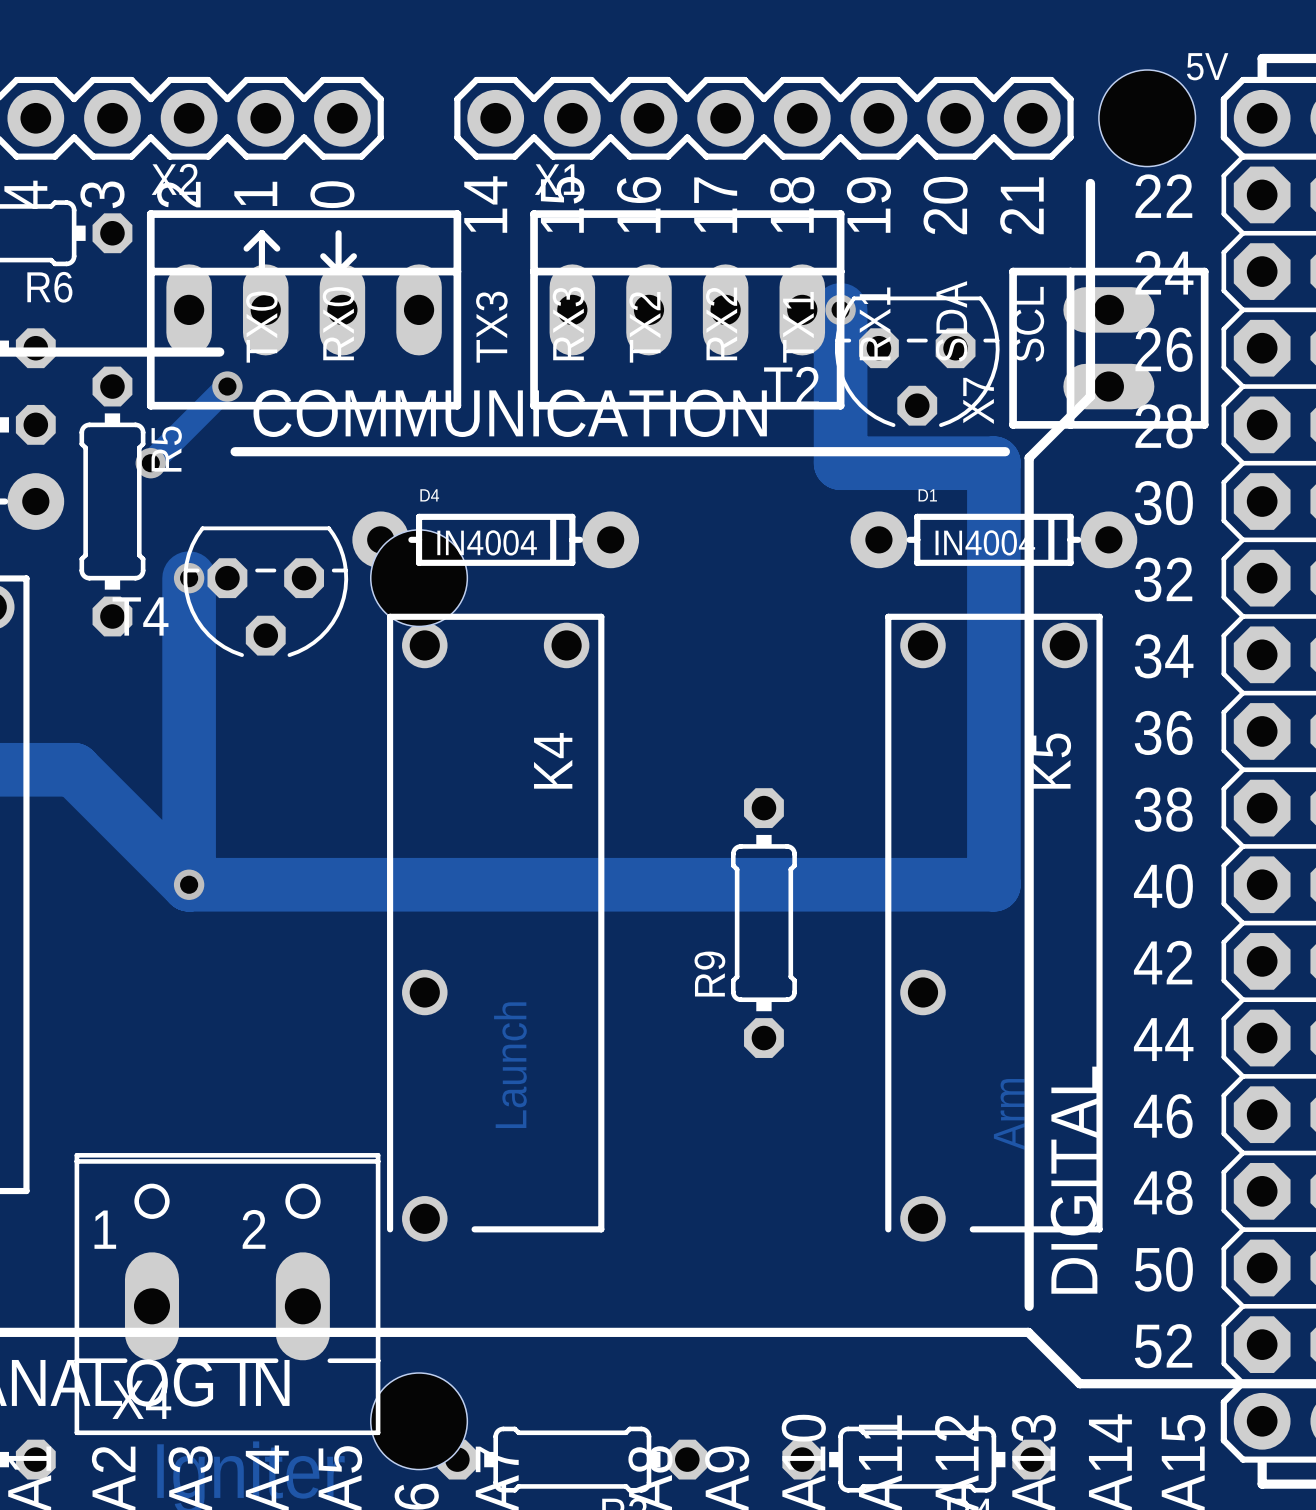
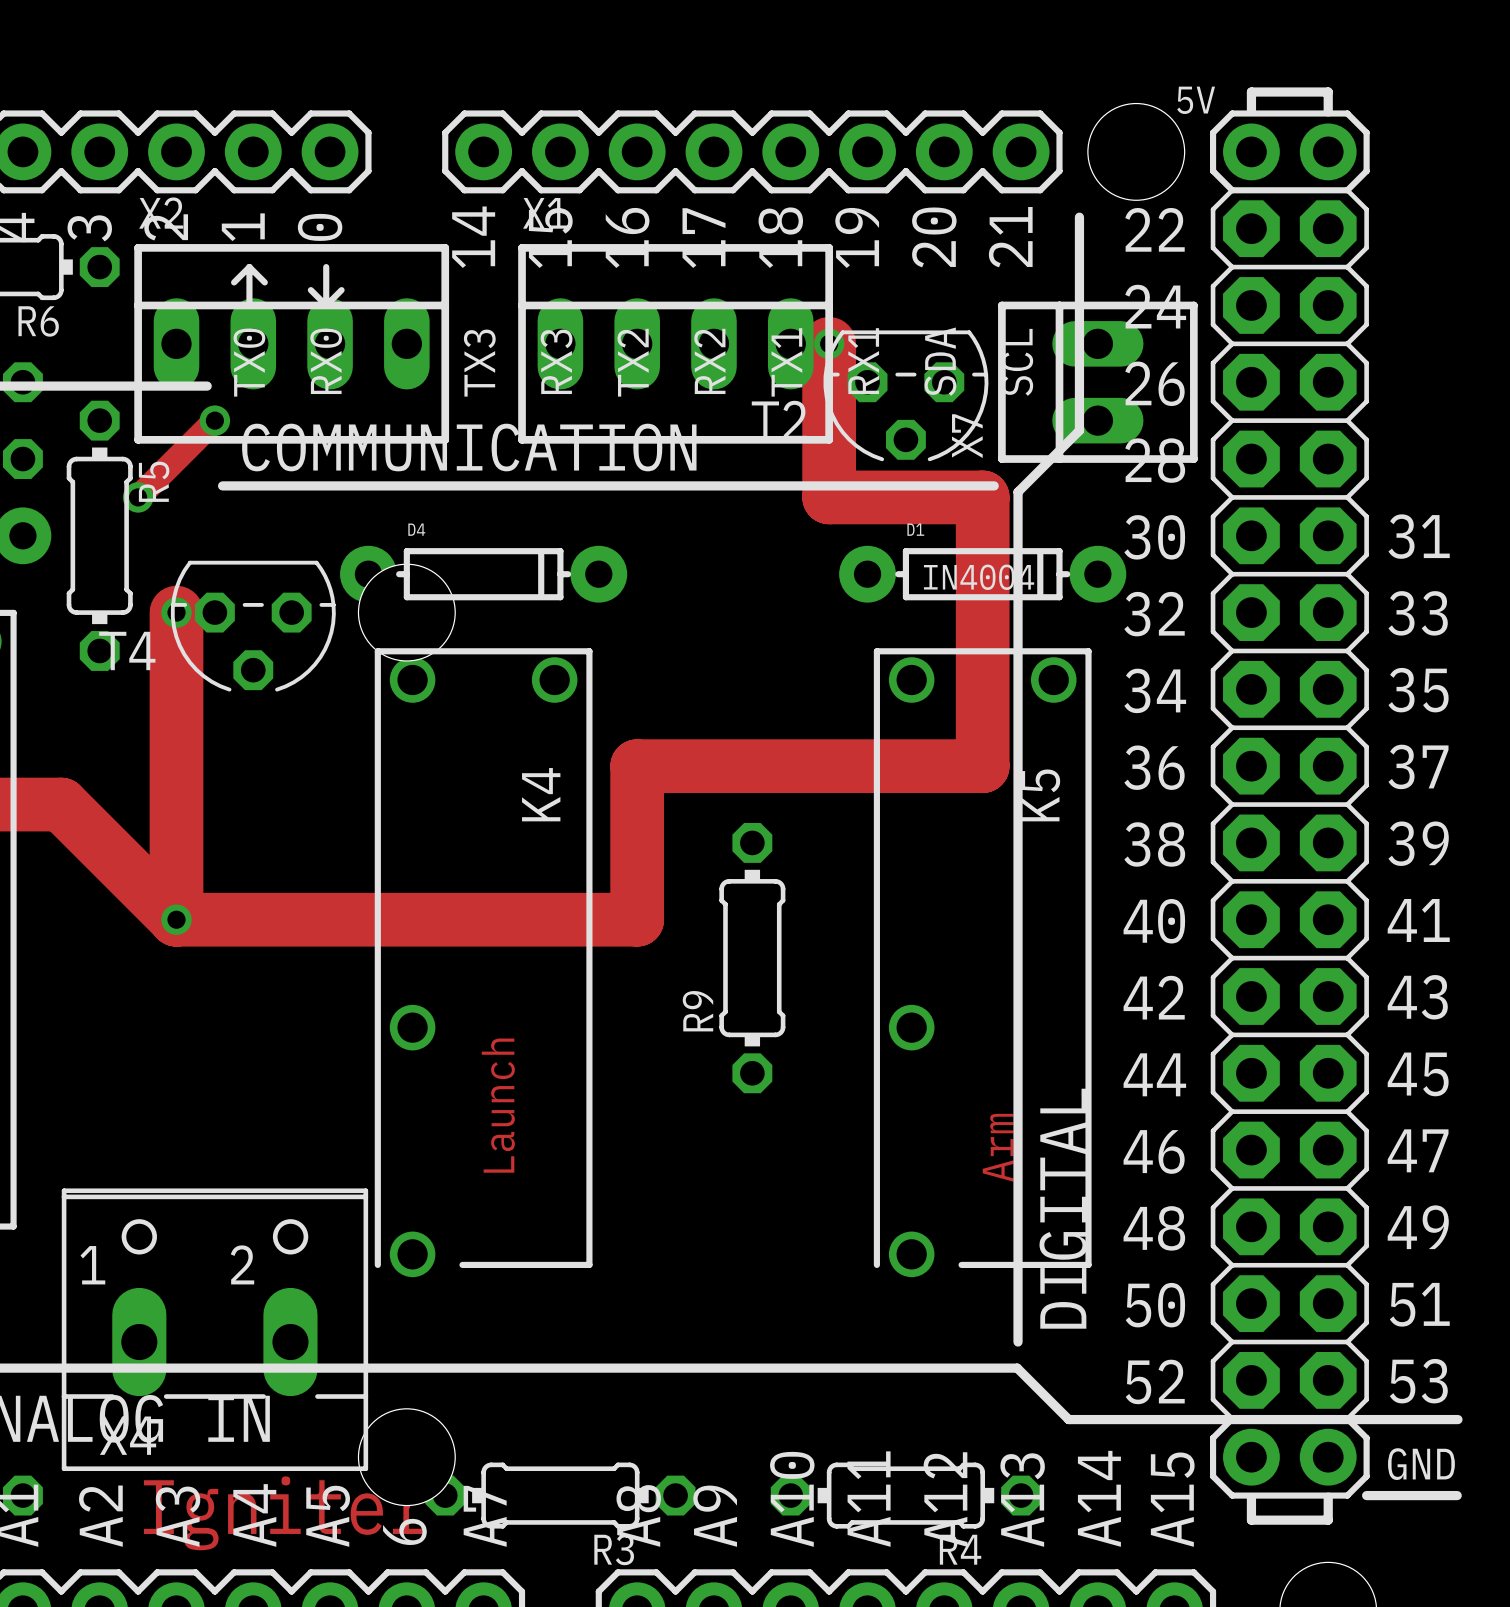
D4 value: IN4004 (487, 542) -> none
track: (993, 731) (993, 884) (648, 884) -> (982, 766) (637, 766) (637, 919)

